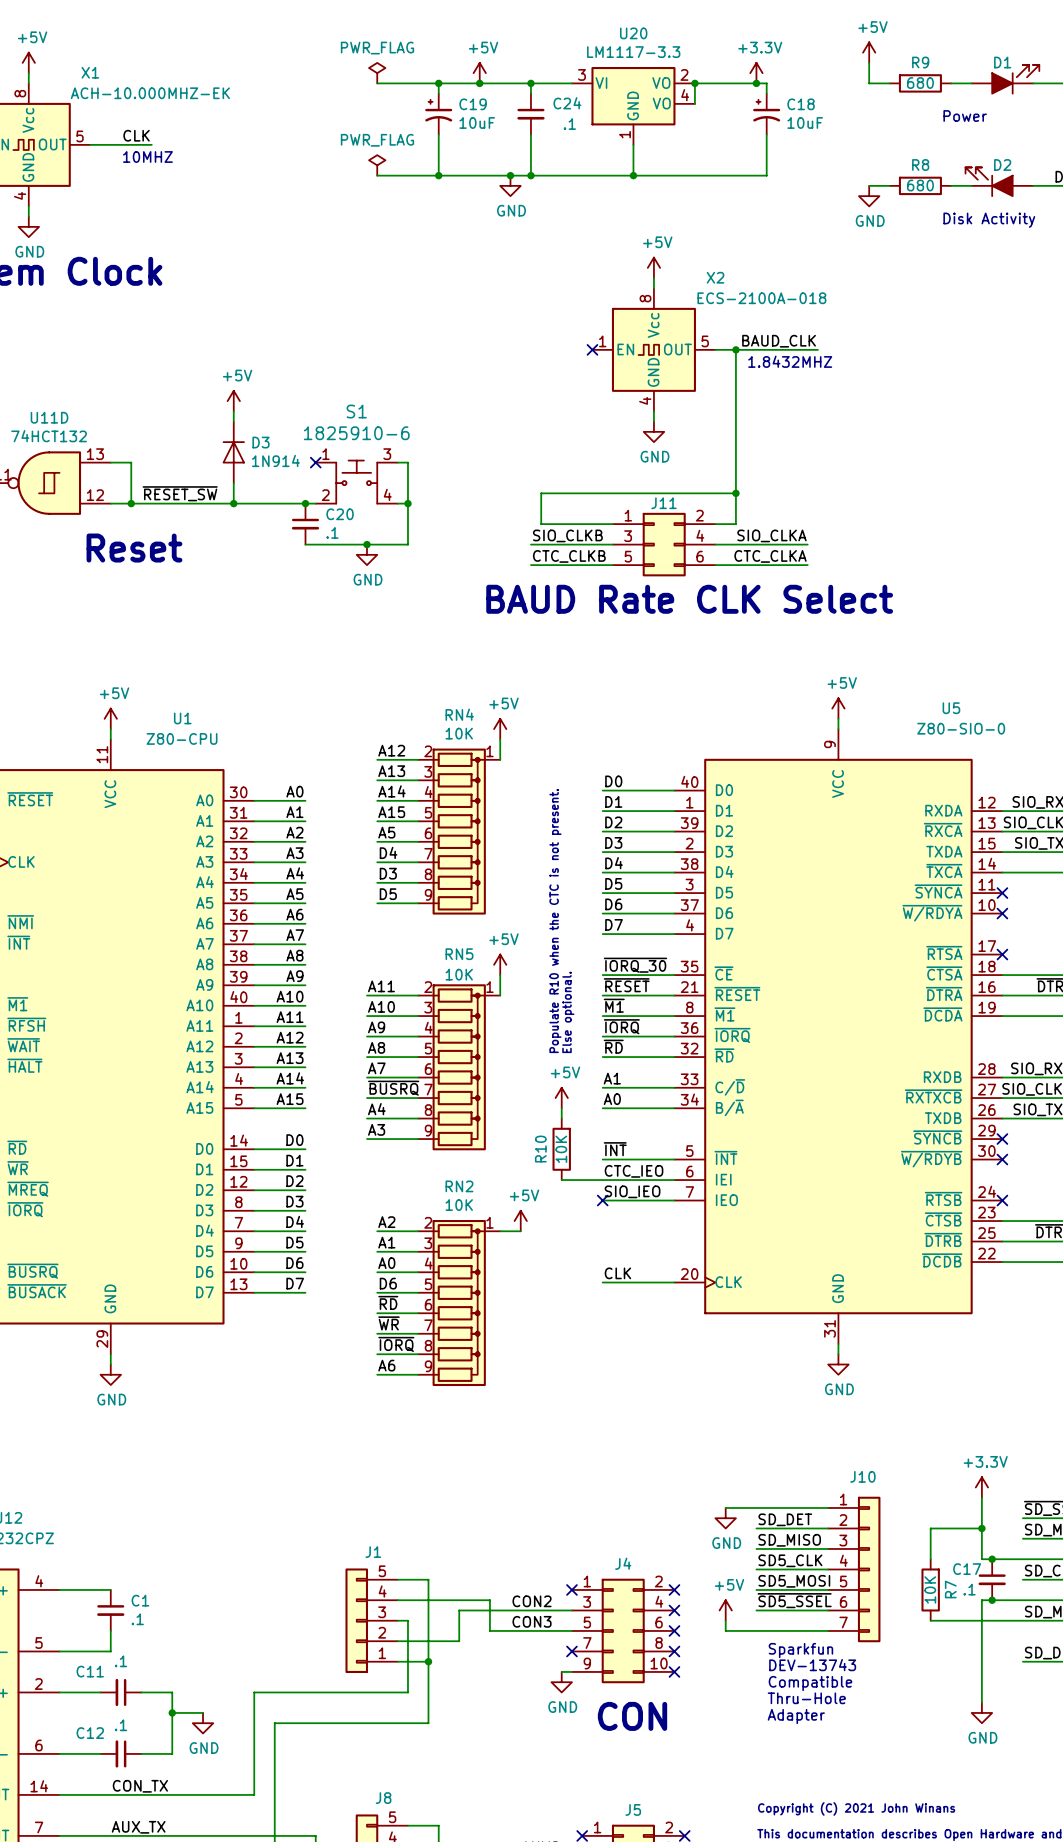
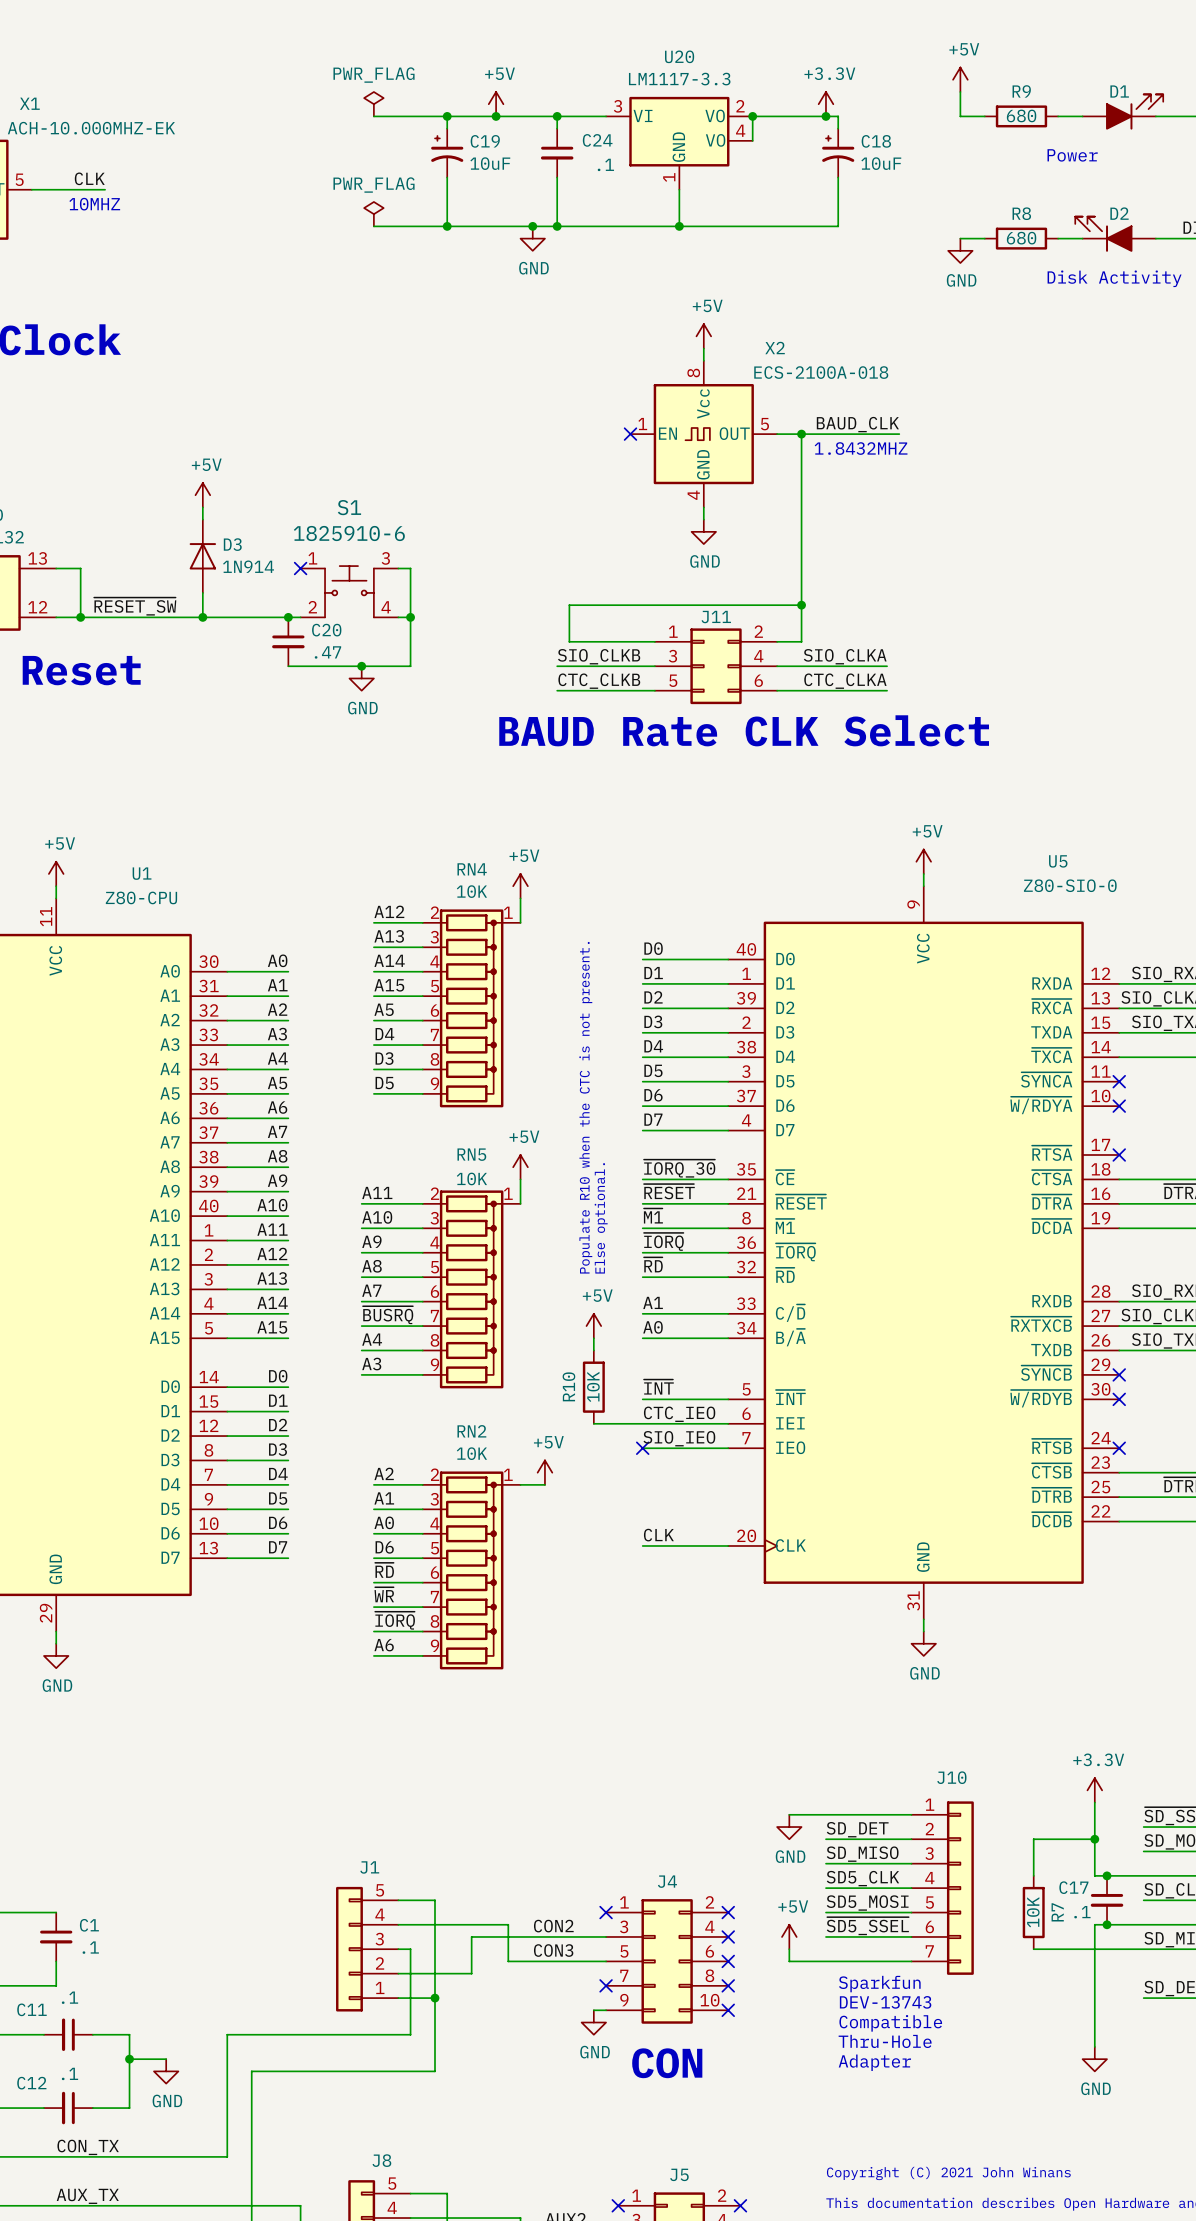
C20 value: .1 (332, 532) -> .47 (327, 652)

